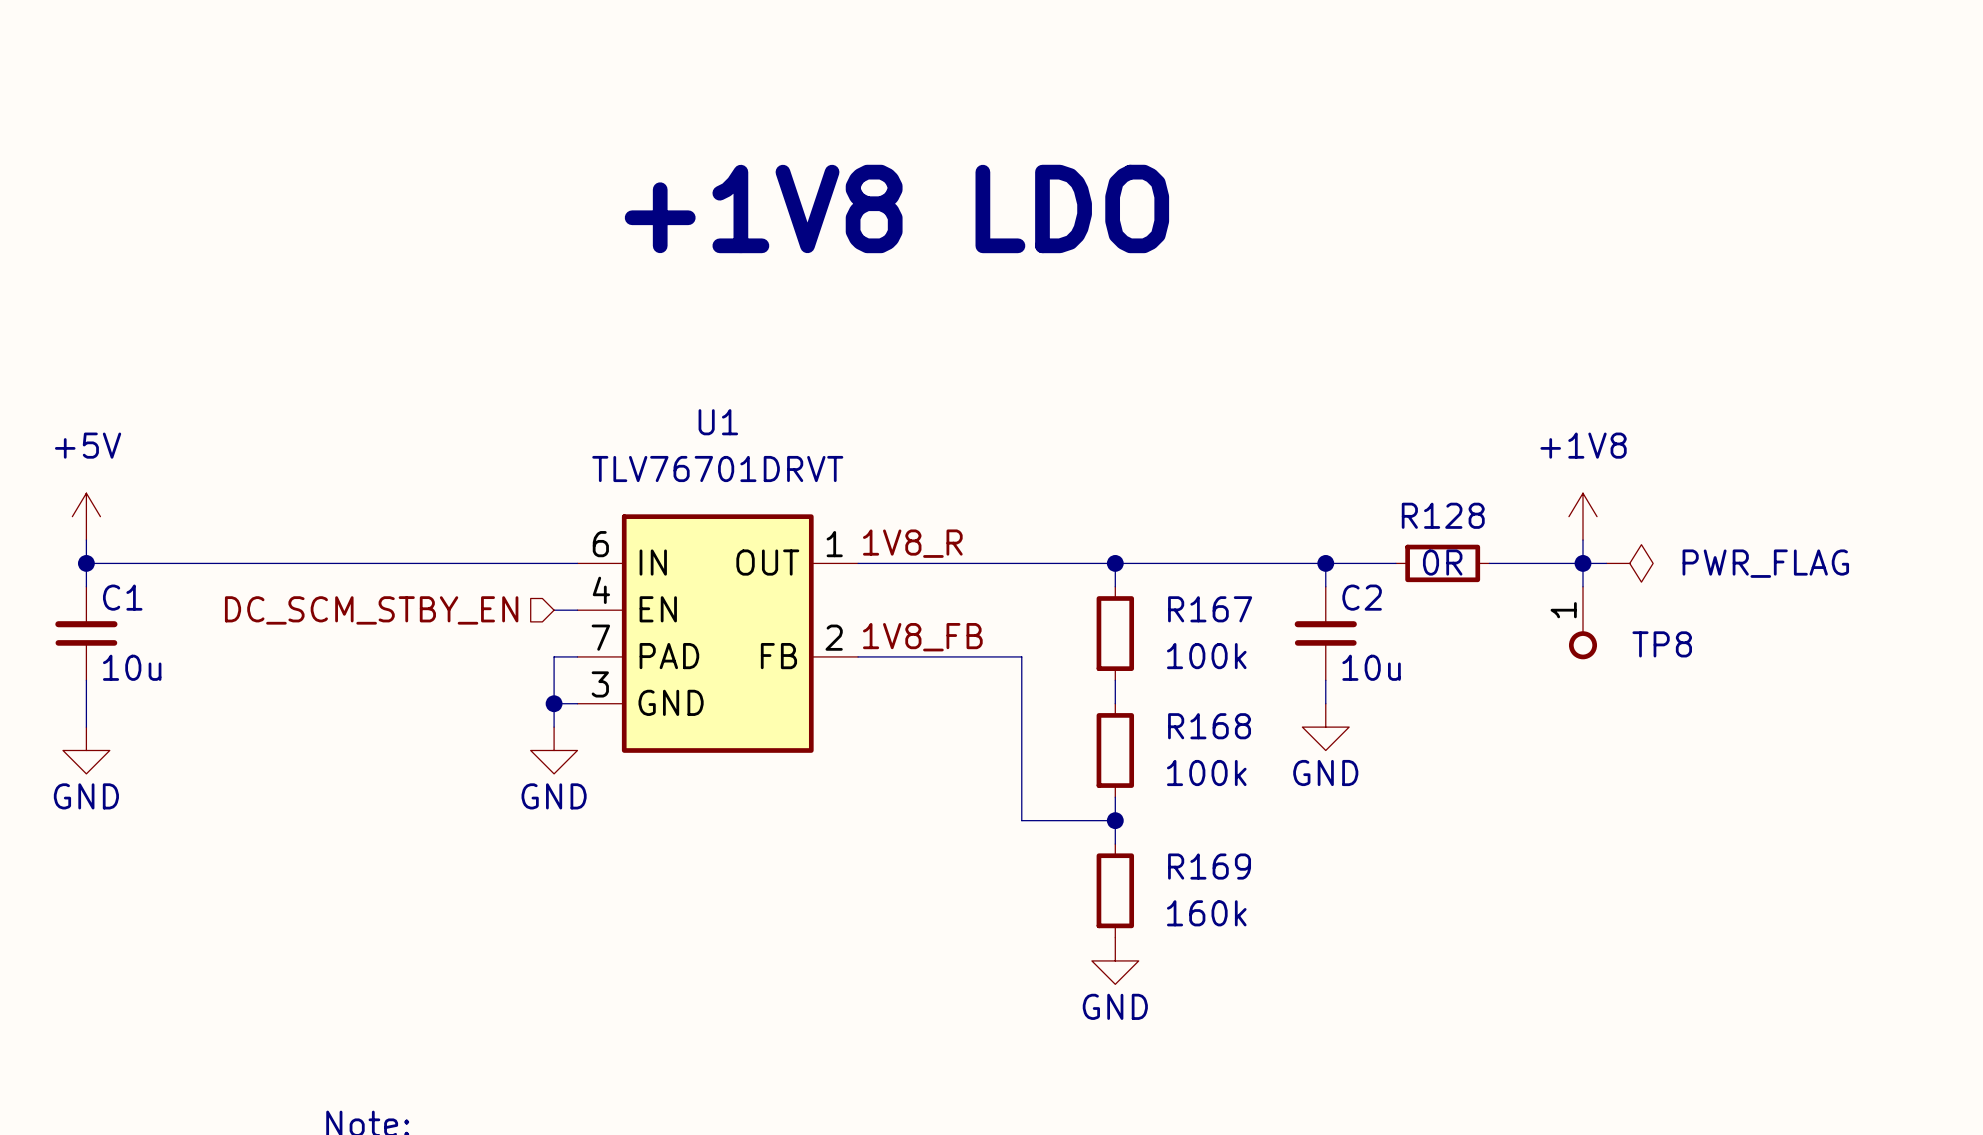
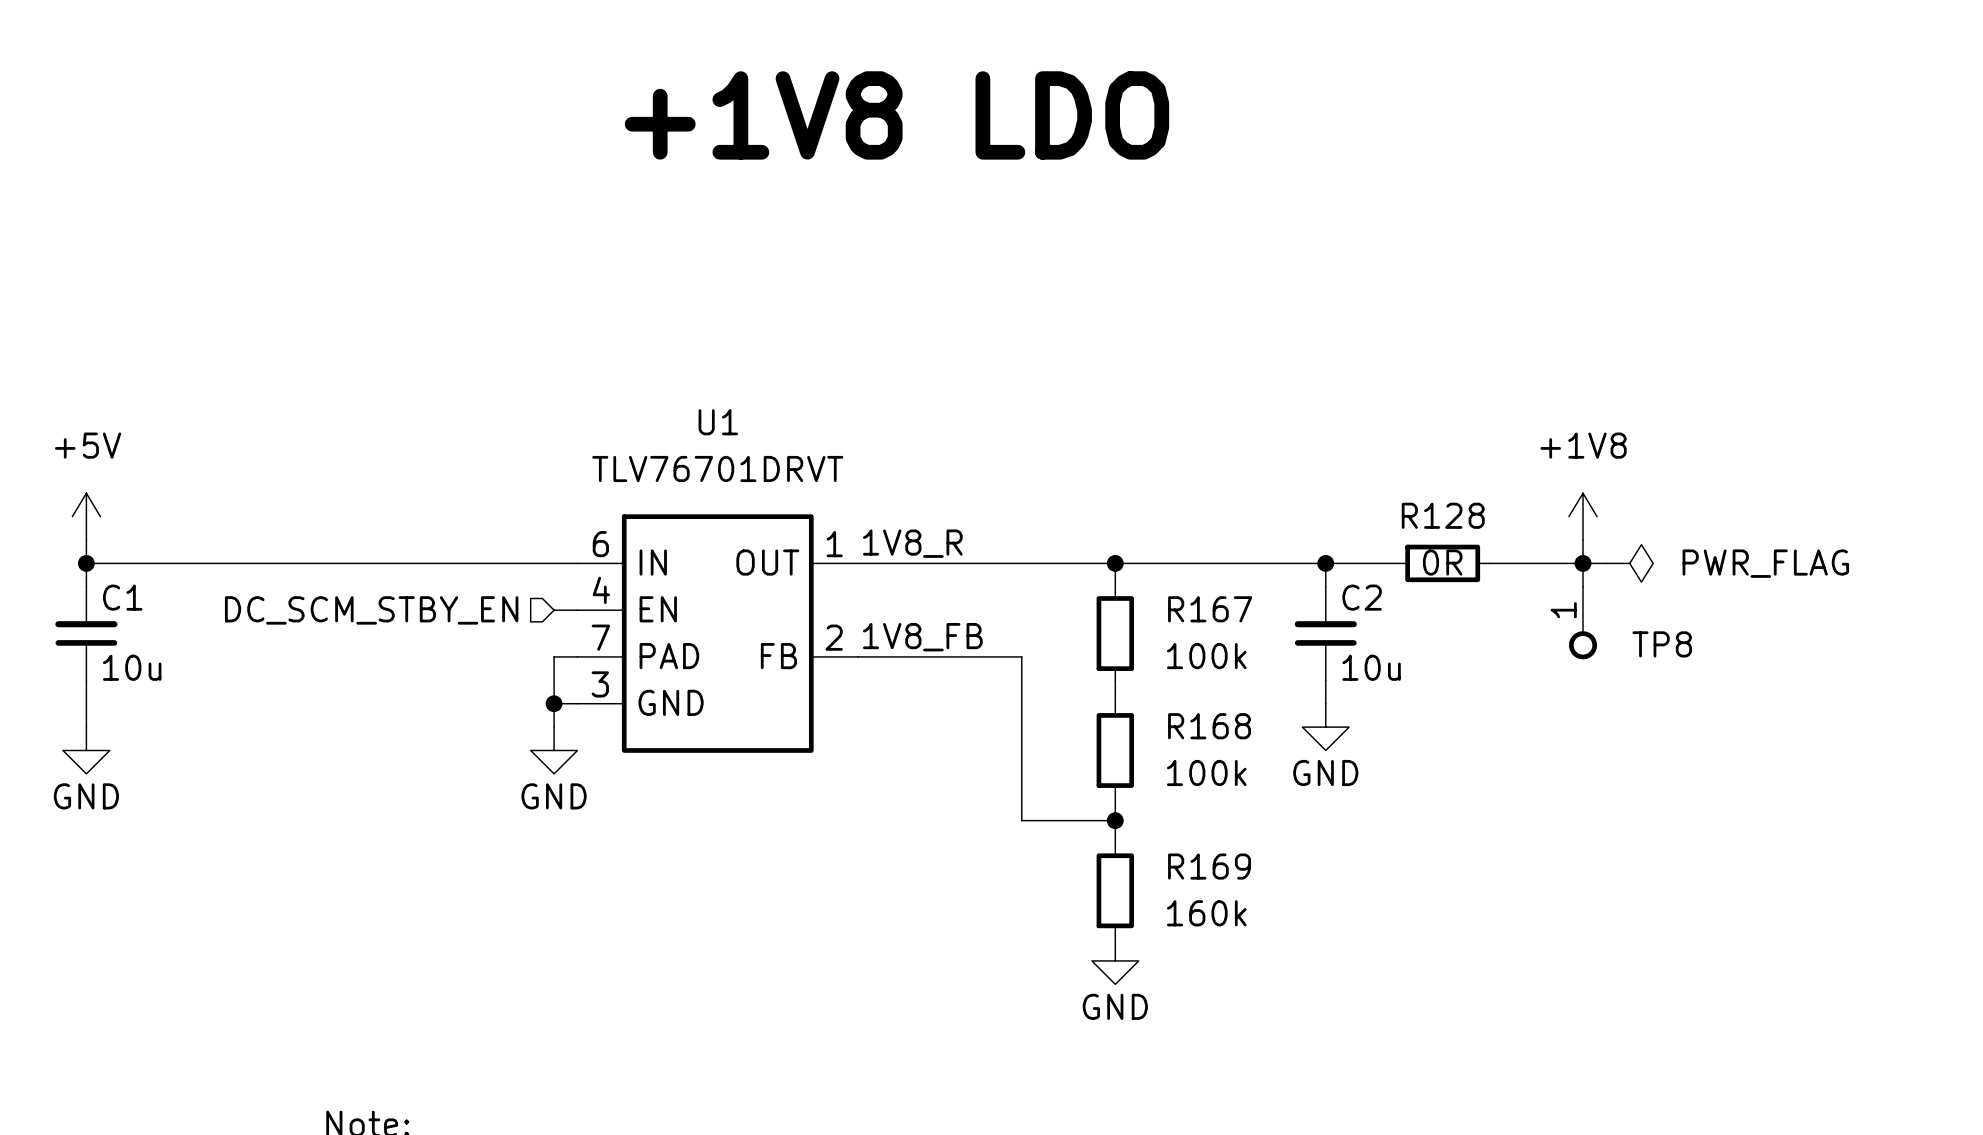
text position: +1V8 LDO (896, 208) -> +1V8 LDO (896, 115)

